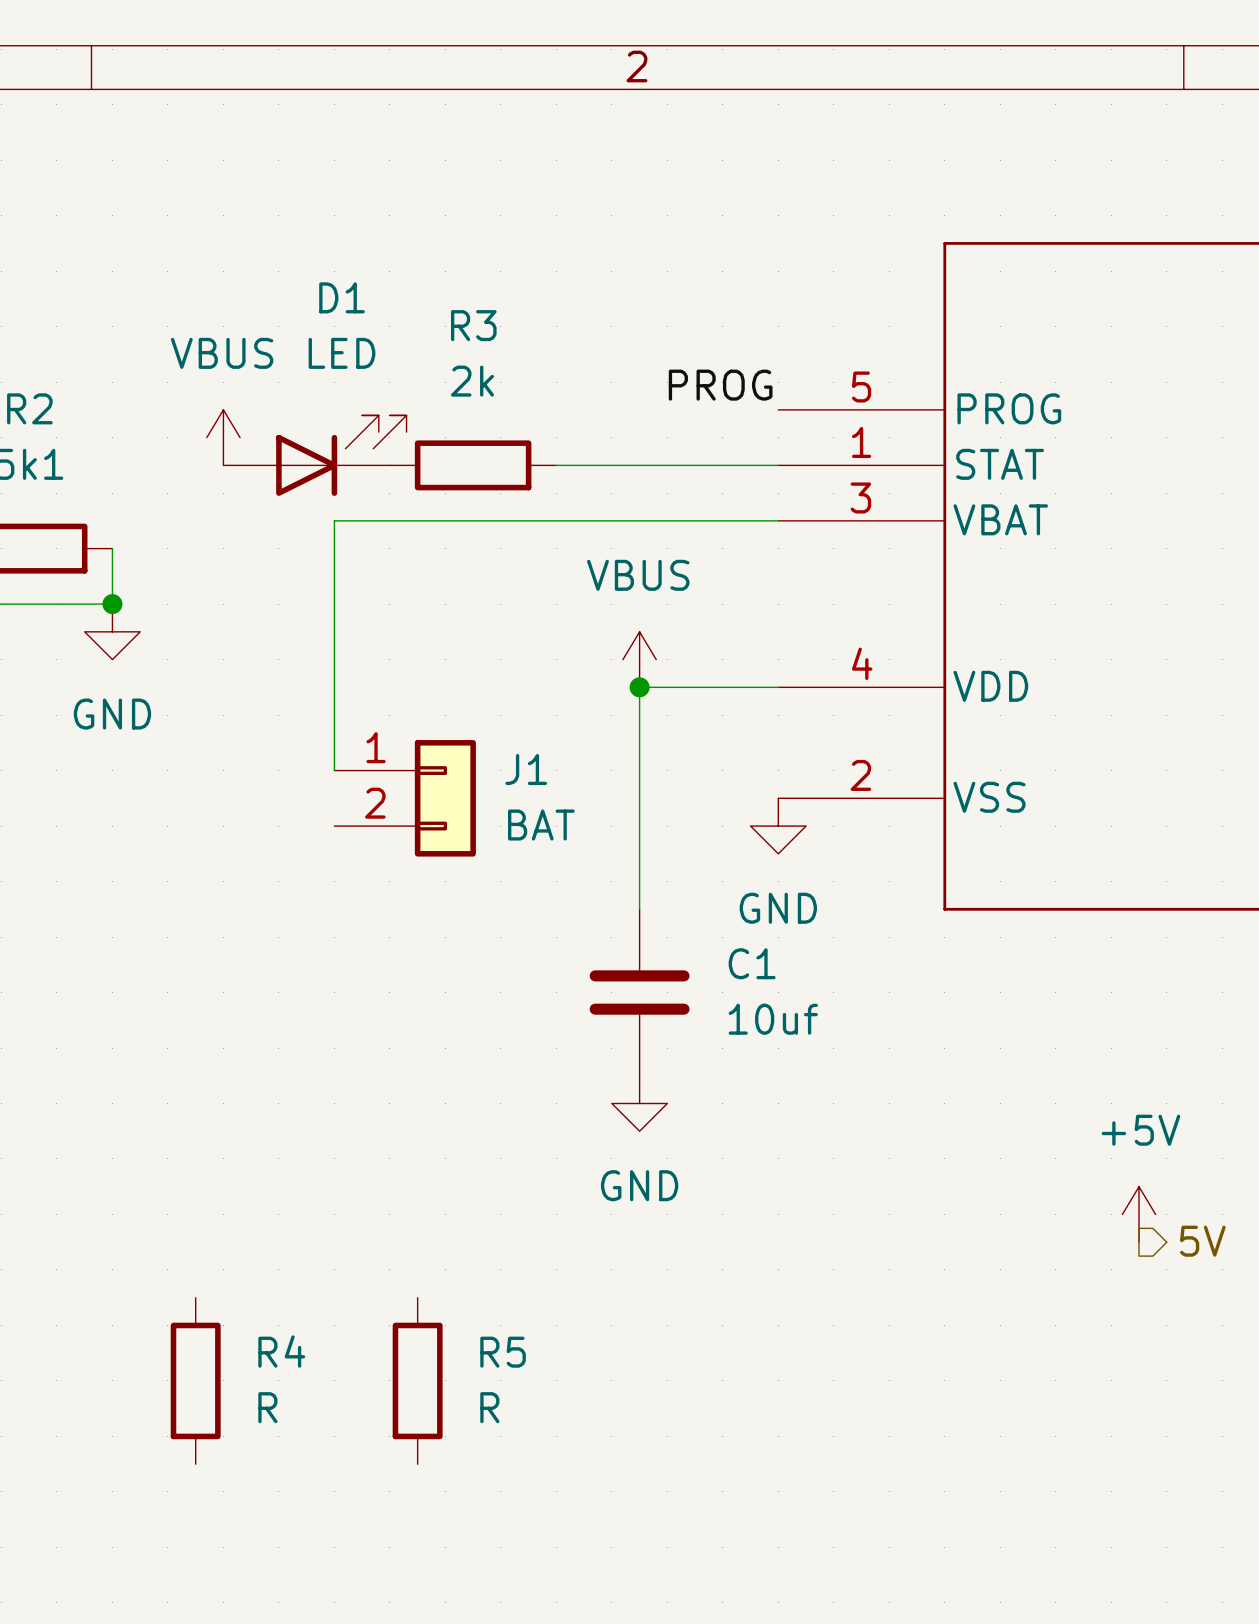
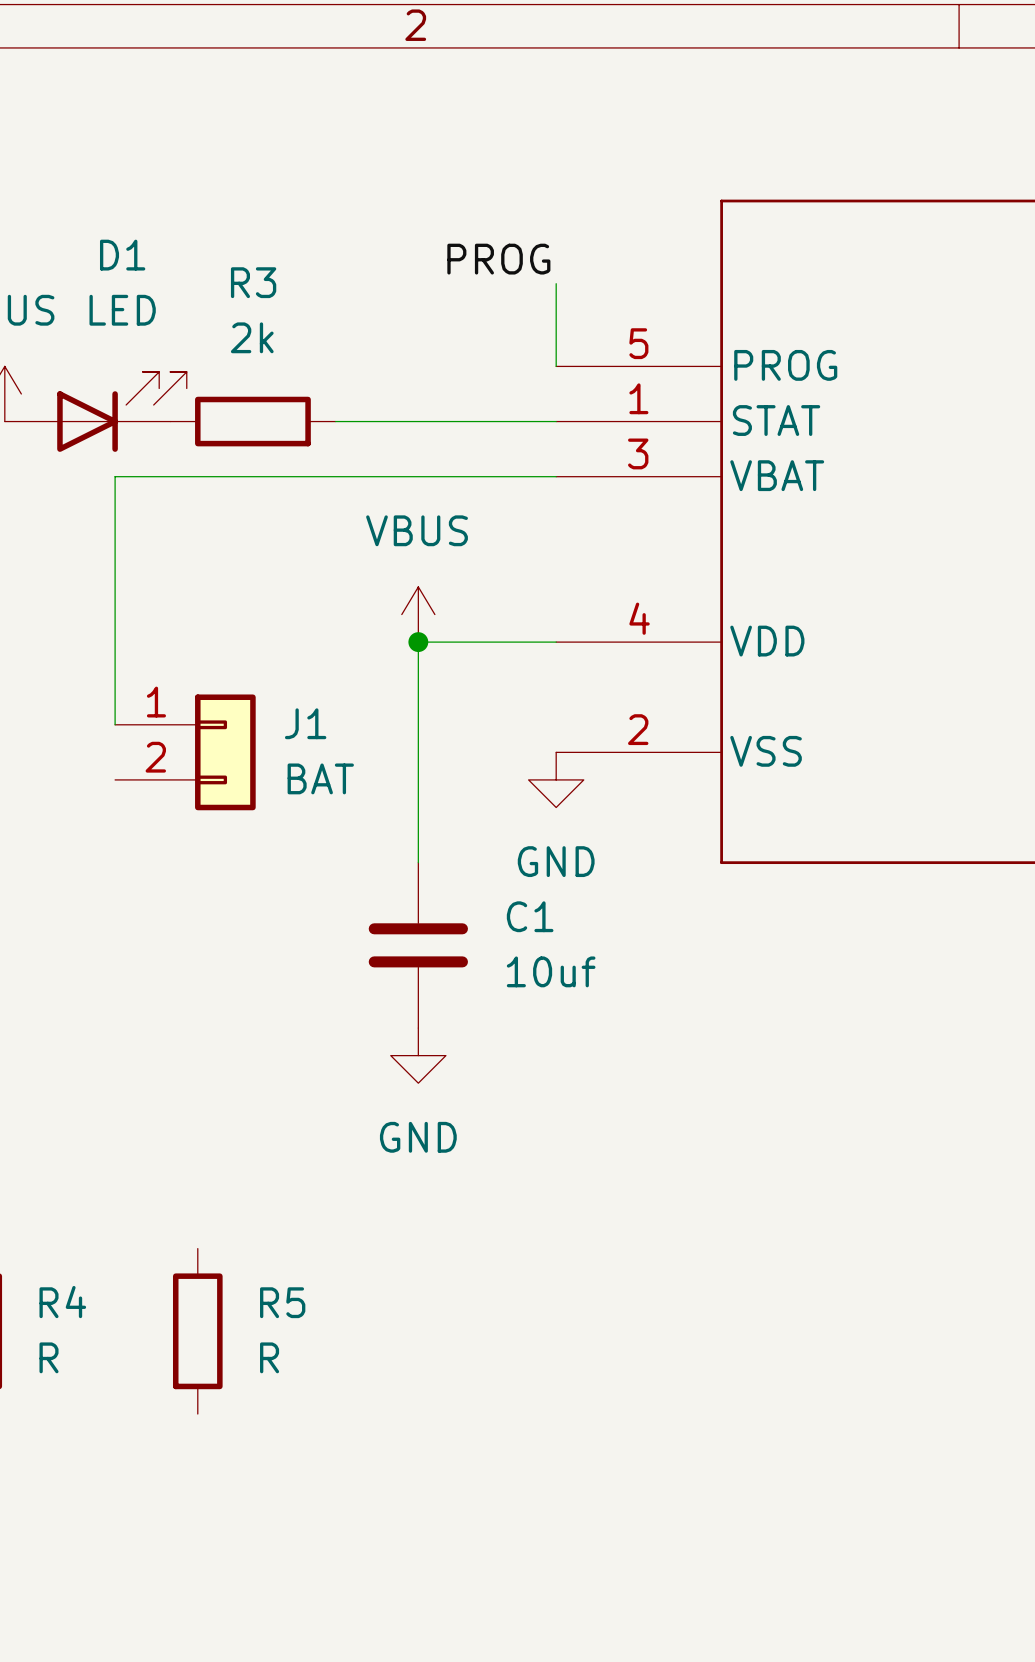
wire: none -> (556, 283) (556, 366)
label position: PROG (720, 385) -> PROG (498, 259)
power symbol: +5V (1139, 1214) -> none
hierarchical label: 5V (1202, 1241) -> none

